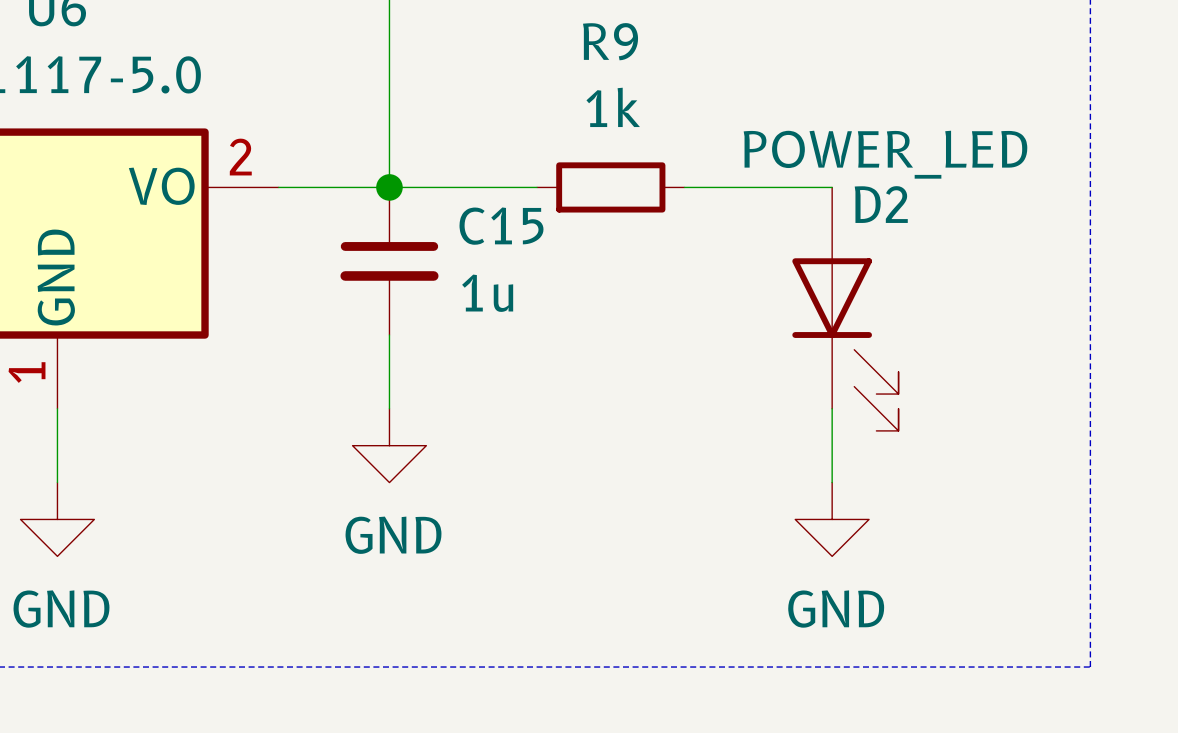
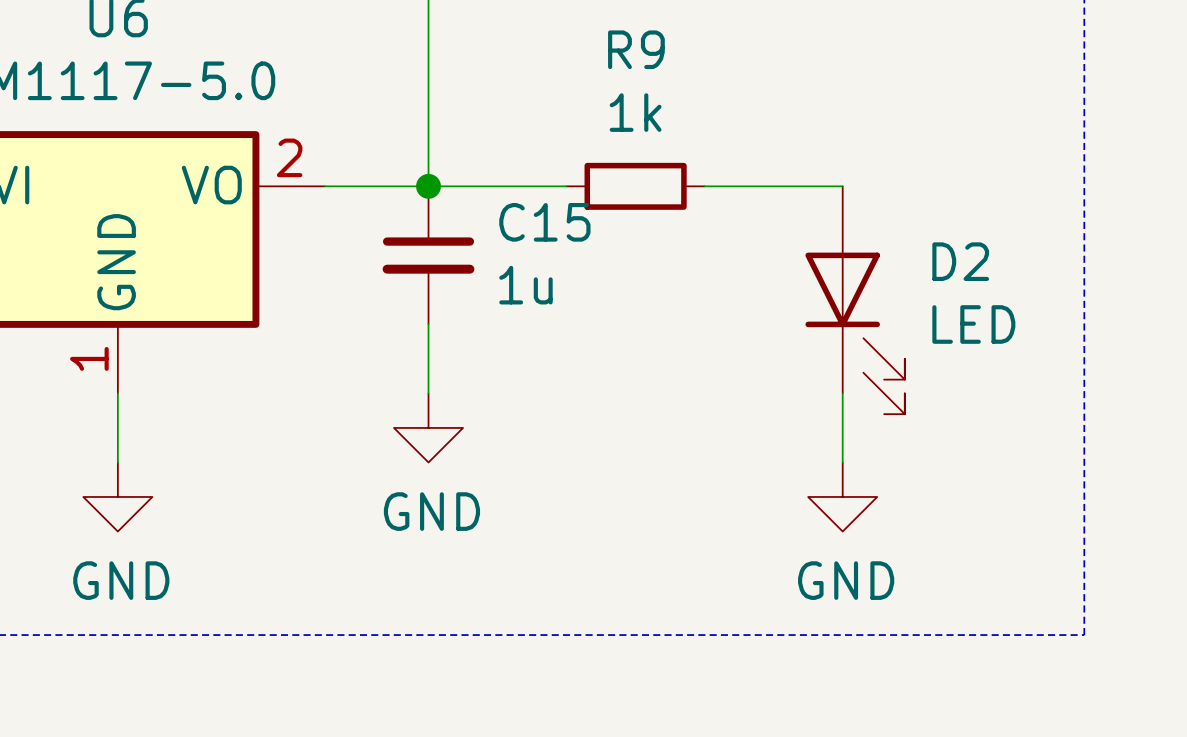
D2 value: POWER_LED (885, 154) -> LED (973, 324)
D2 name position: D2 (881, 204) -> D2 (960, 261)

